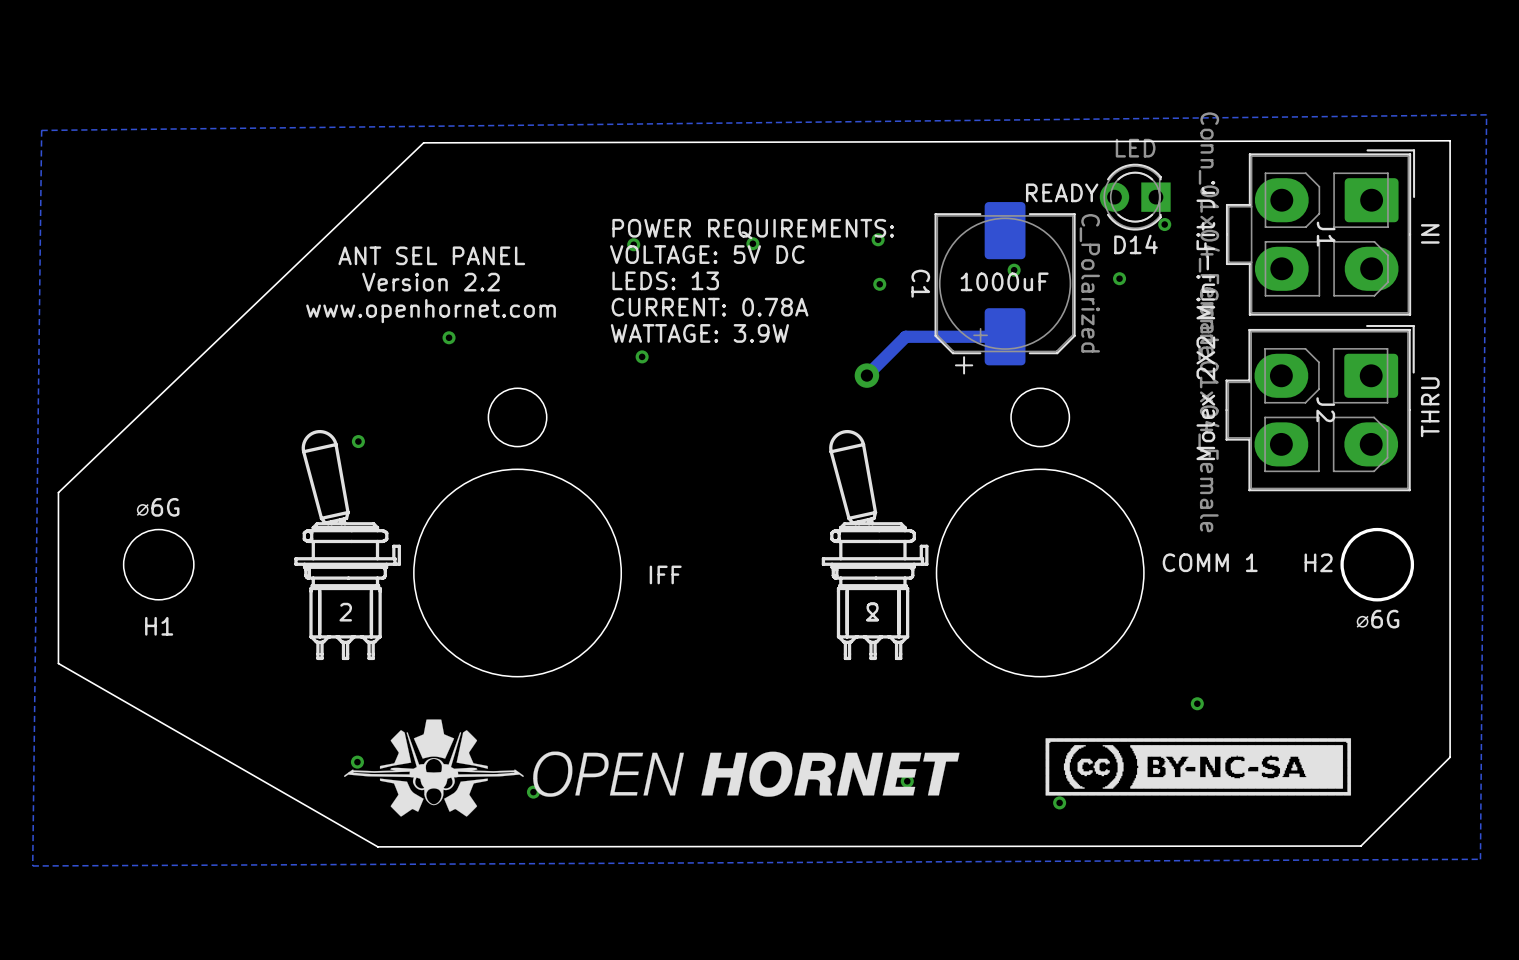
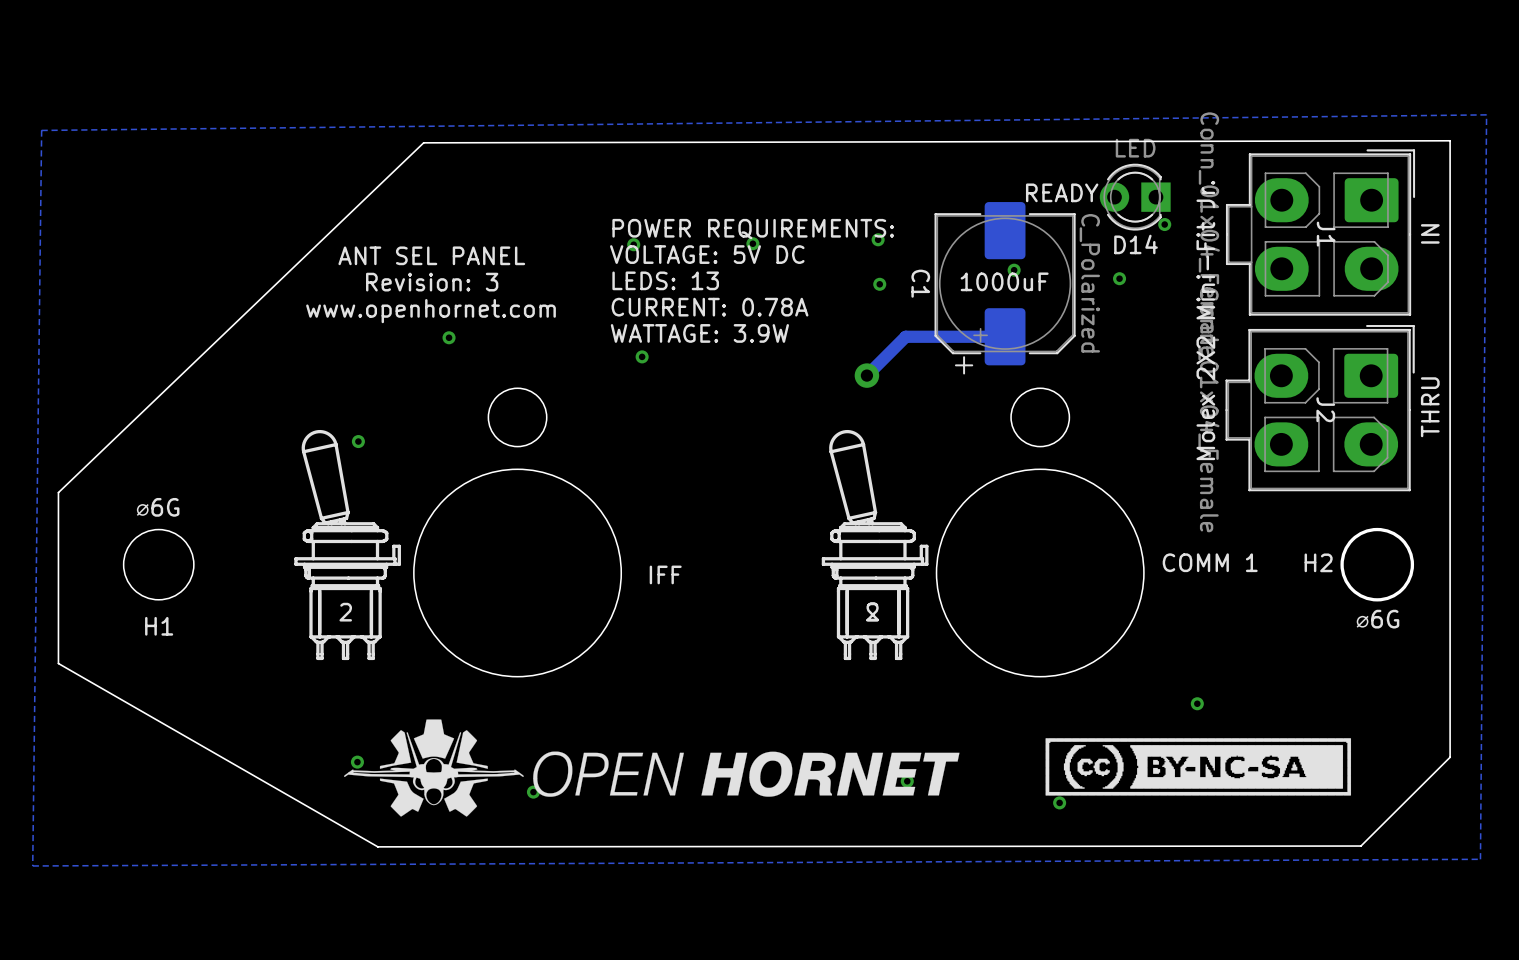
text: Version 2.2 (431, 282) -> Revision: 3 (432, 282)

